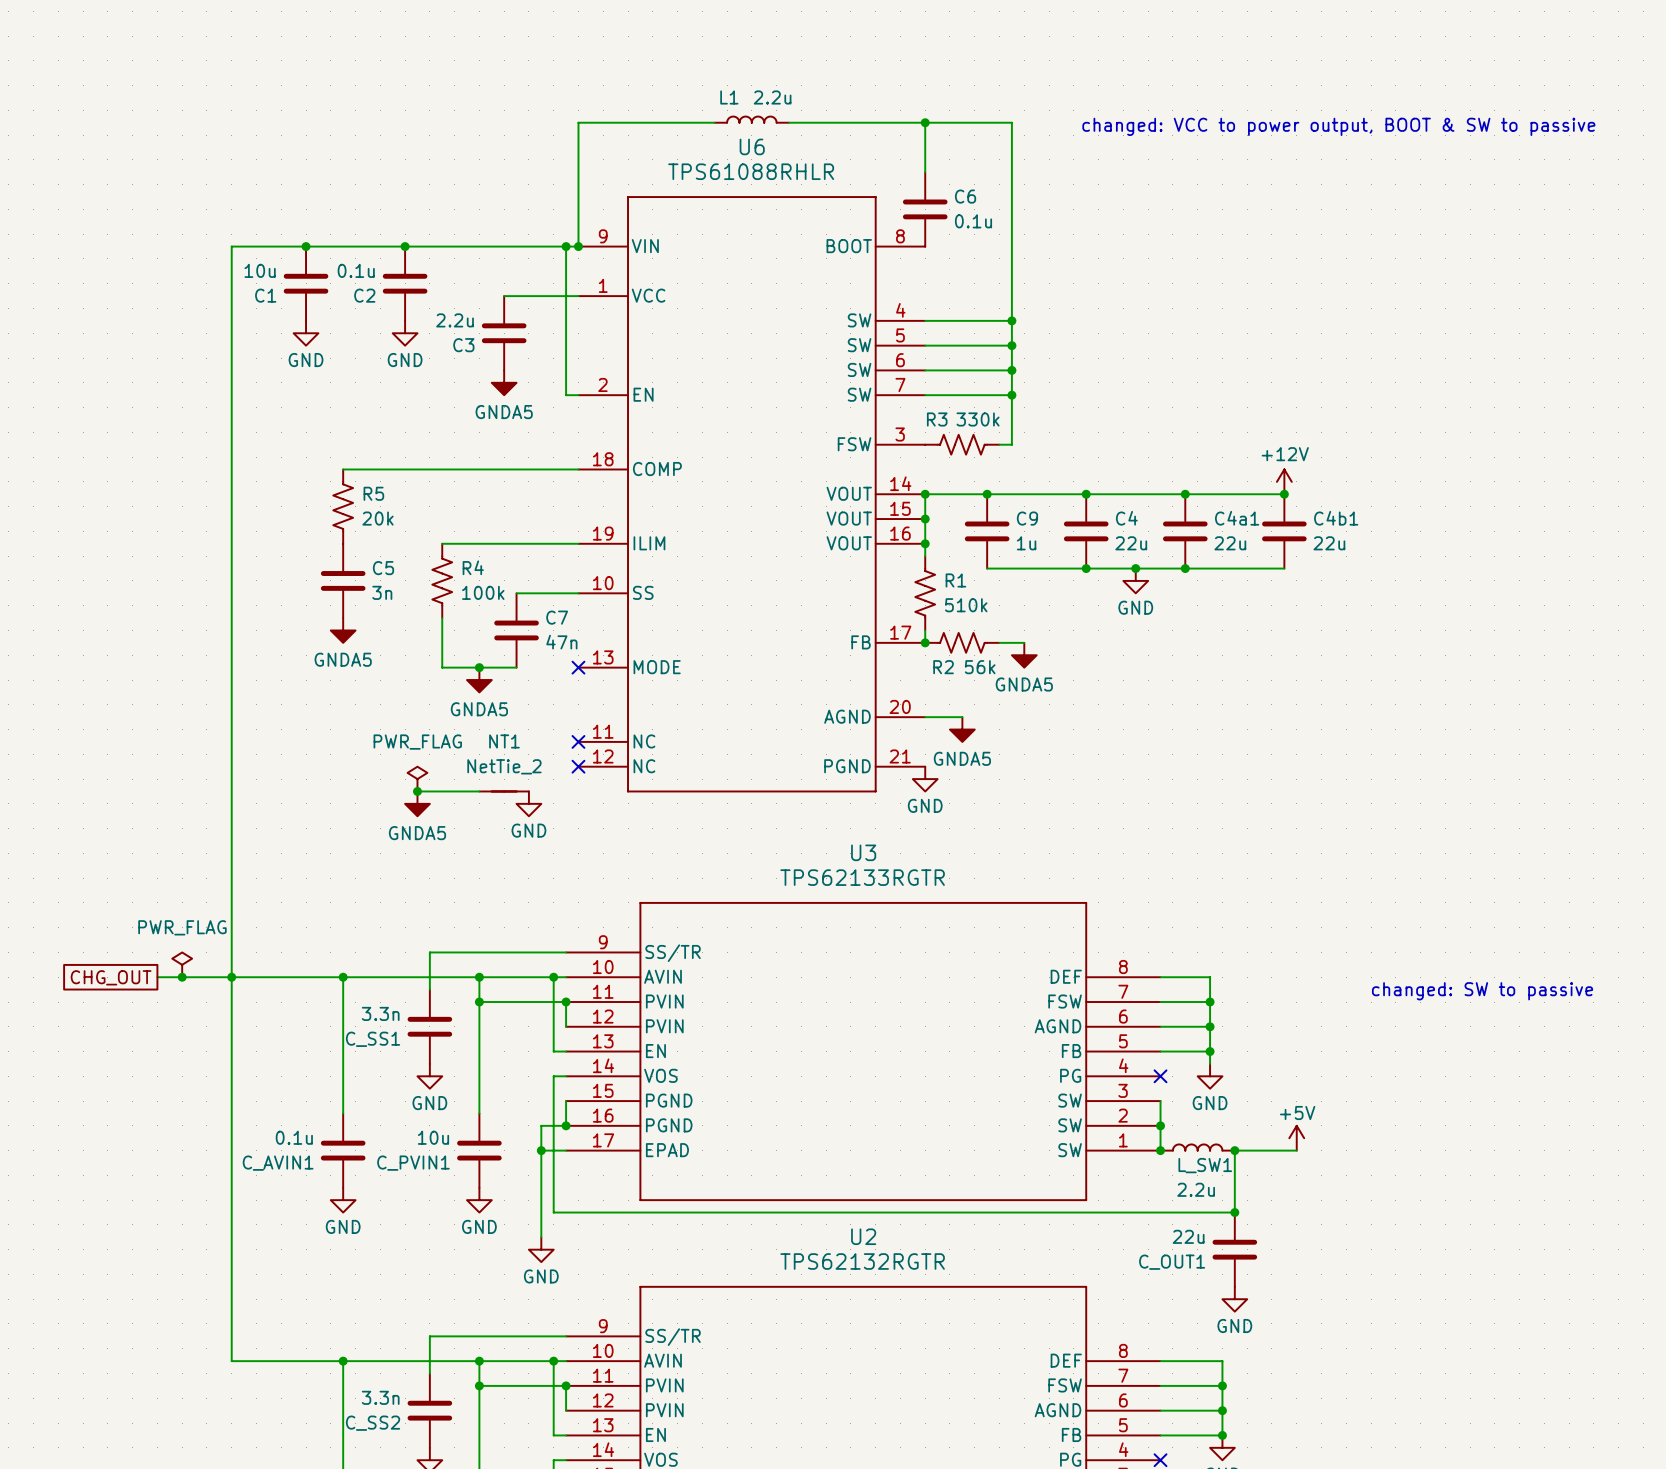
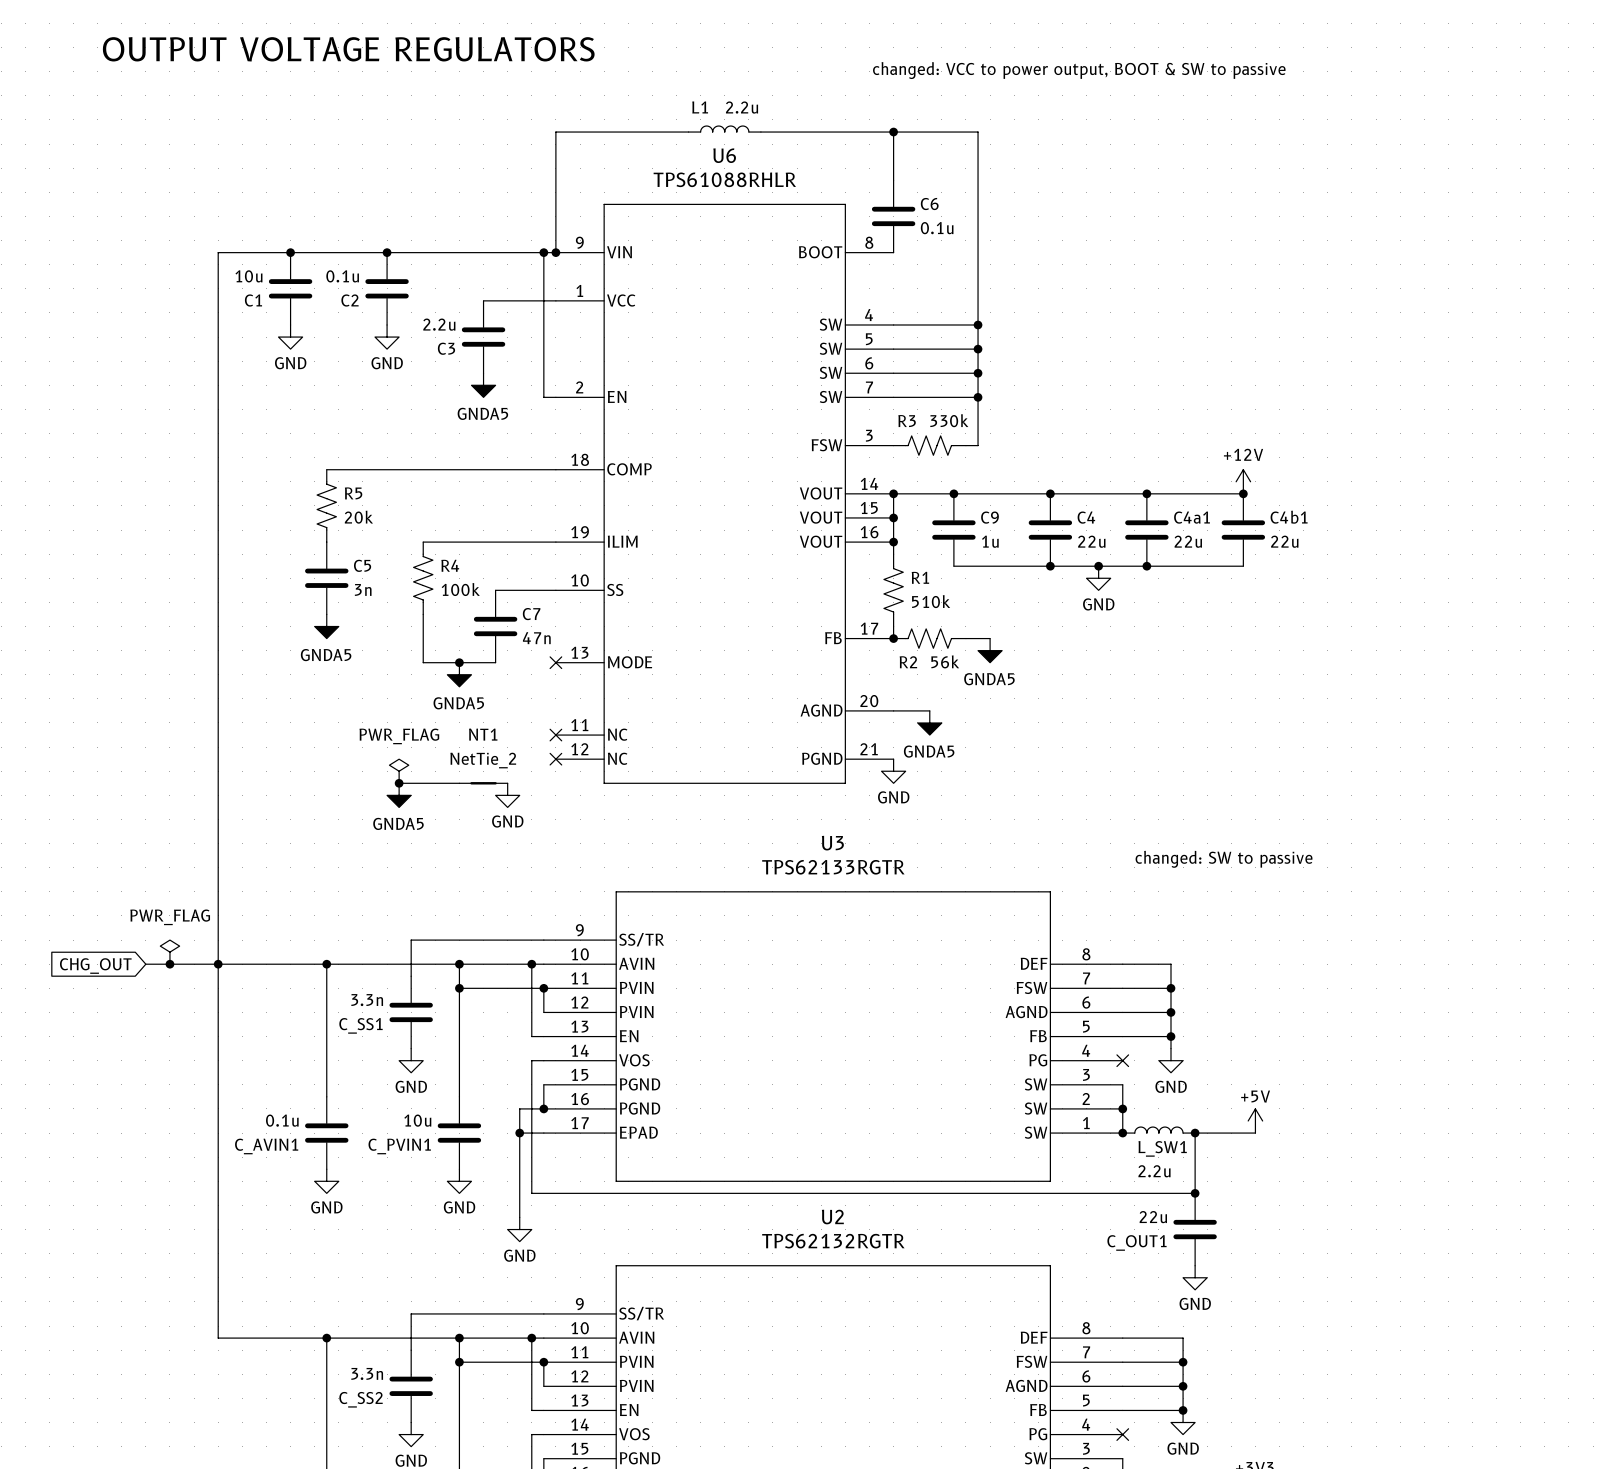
text: none -> OUTPUT VOLTAGE REGULATORS (348, 49)
text position: changed: VCC to power output, BOOT & SW to passive (1338, 126) -> changed: VCC to power output, BOOT & SW to passive (1079, 70)
text: none -> changed: SW to passive (1224, 859)
global label shape: passive (111, 977) -> input (95, 966)
text: changed: SW to passive (1482, 991) -> none

